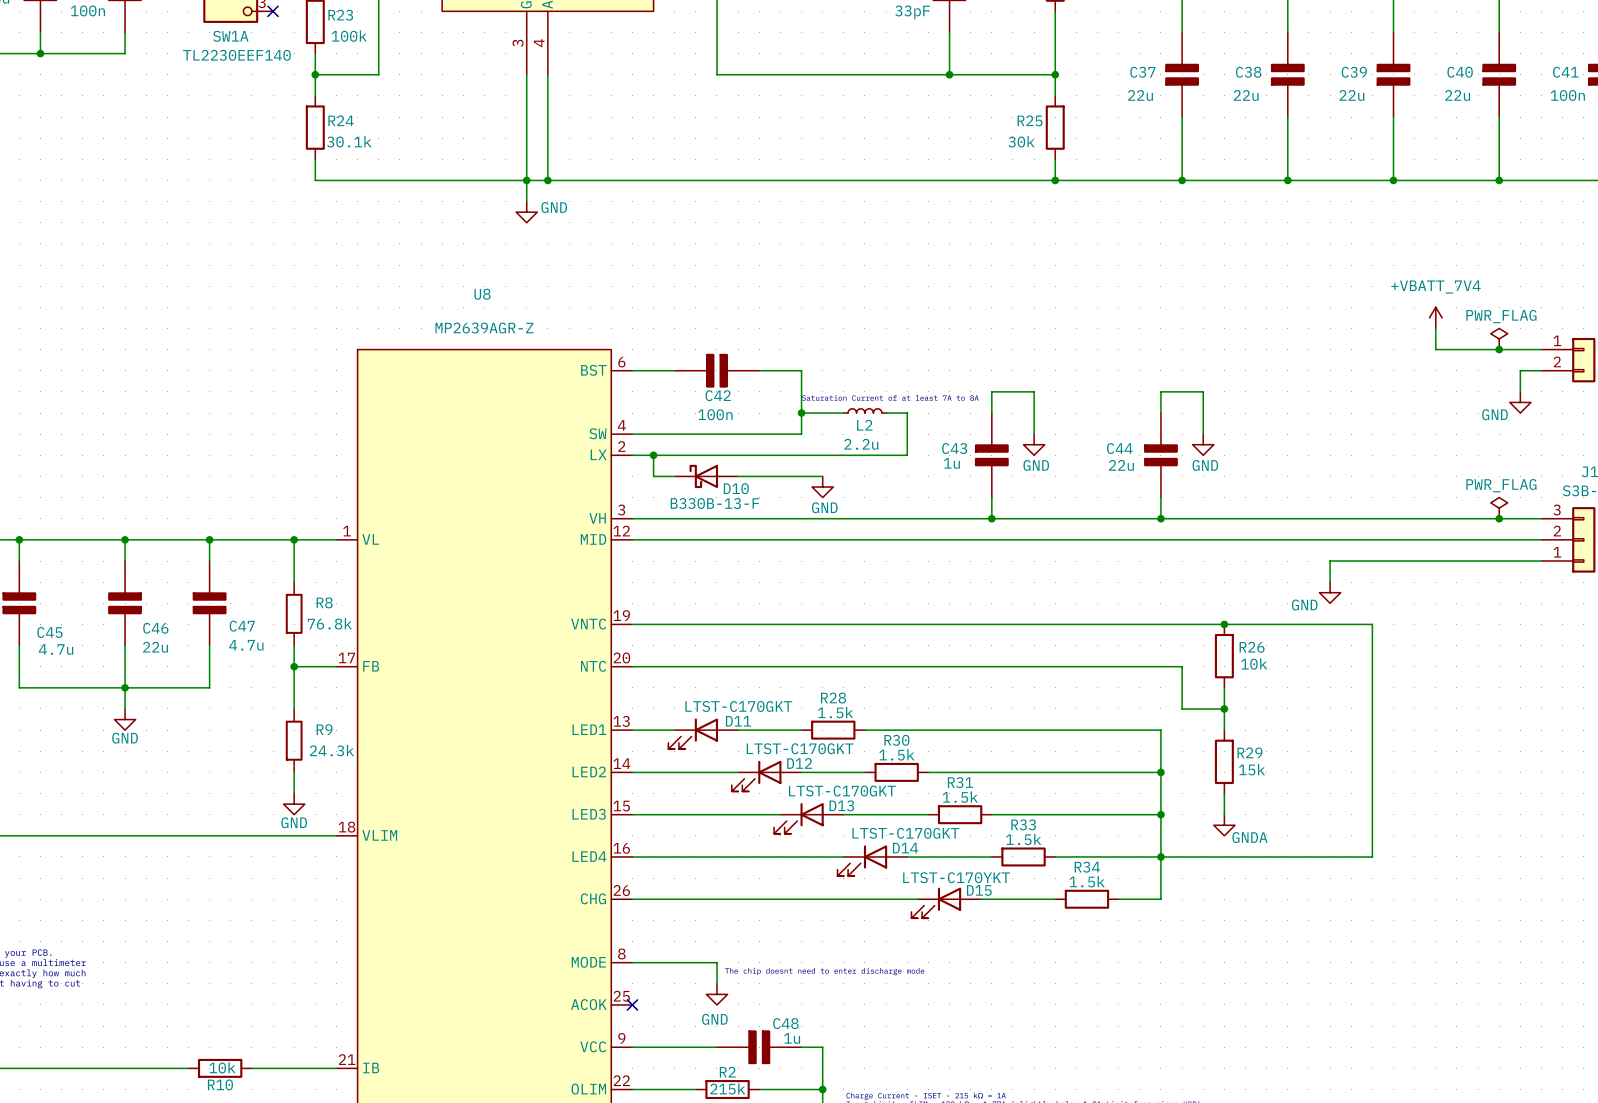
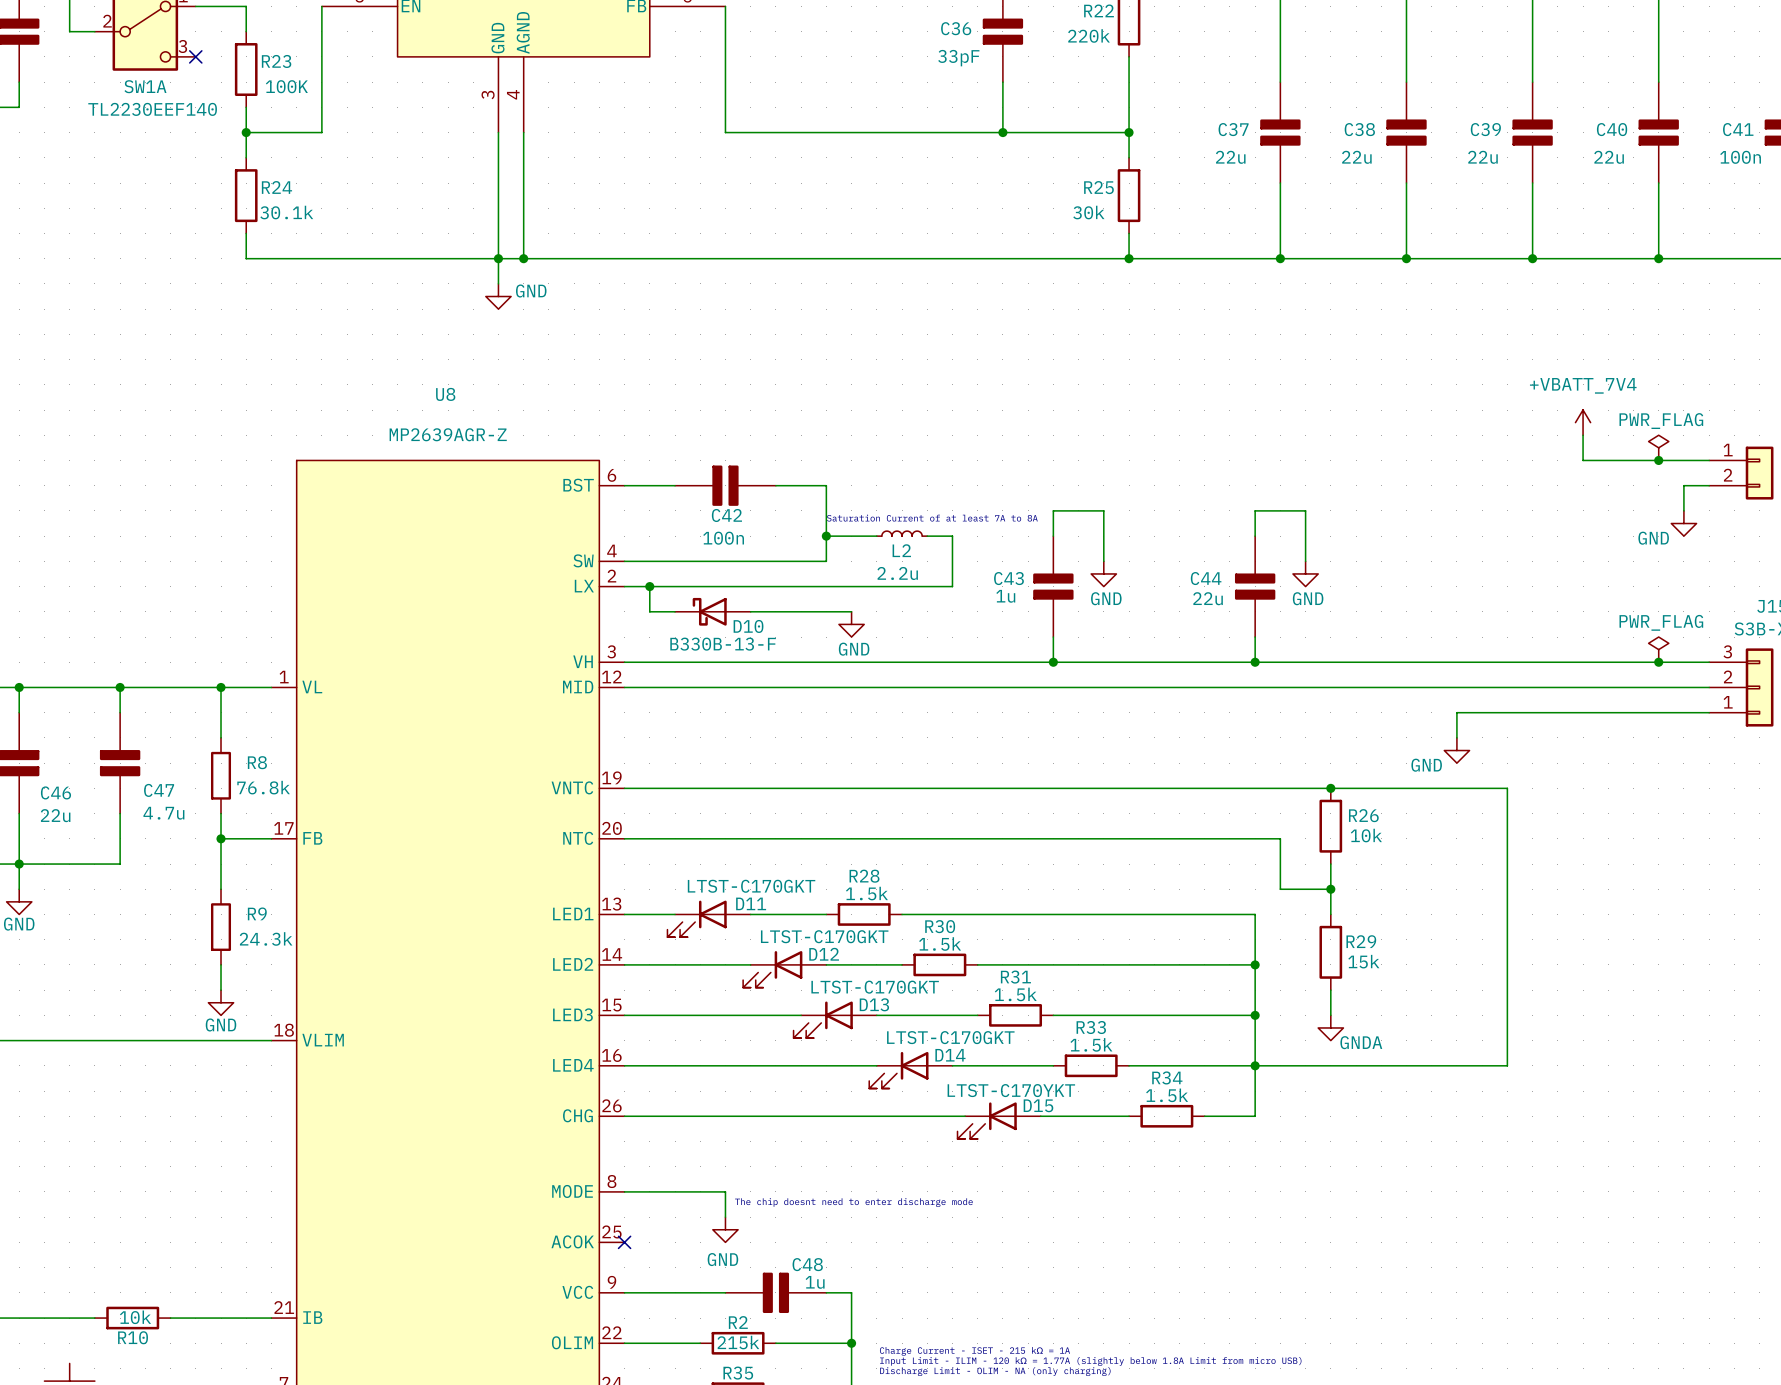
R23 value: 100k (349, 36) -> 100K (286, 86)

